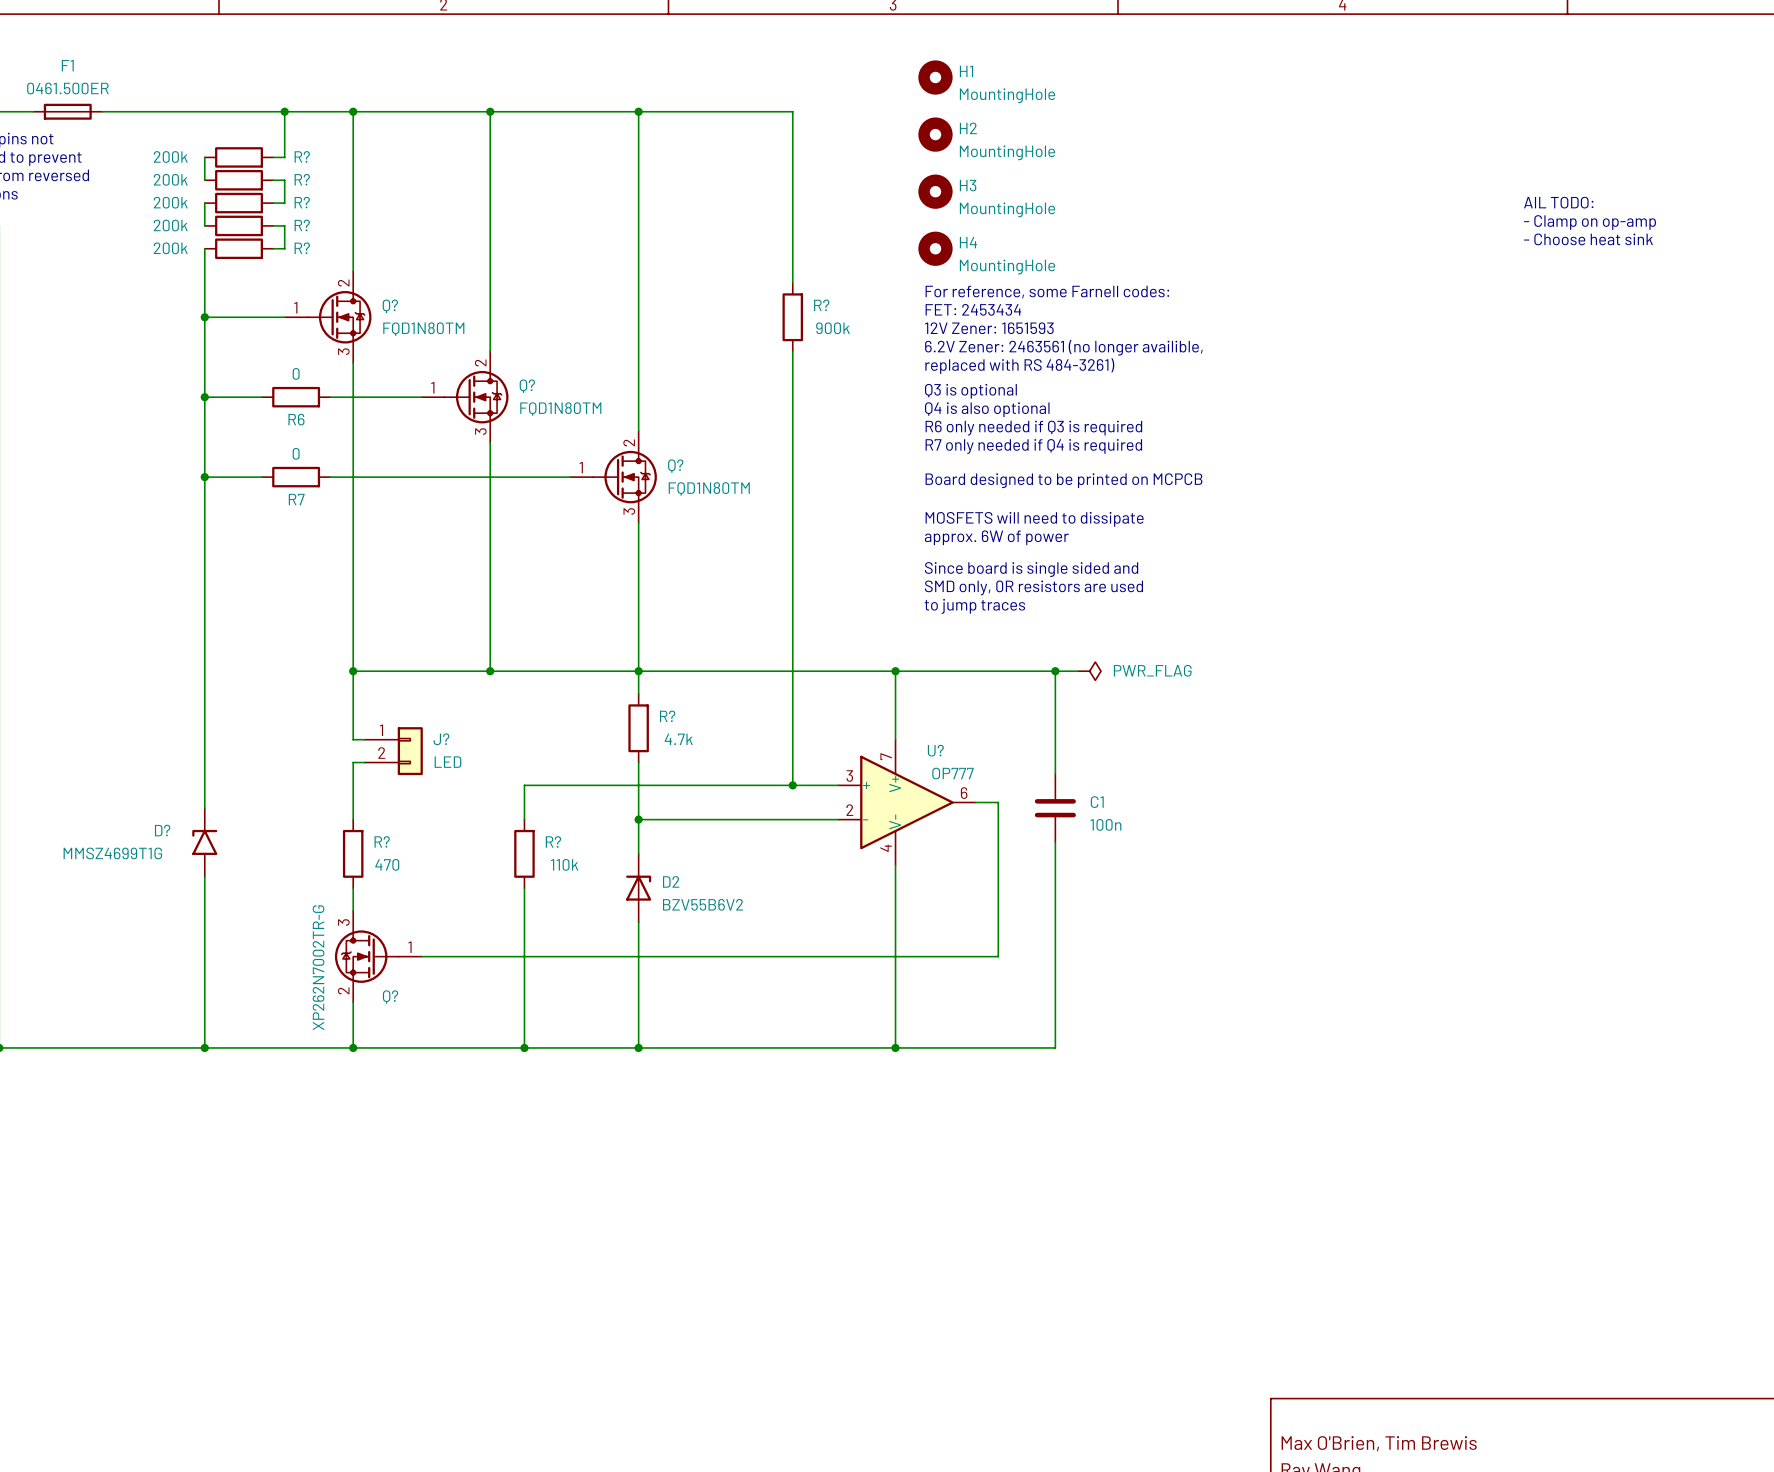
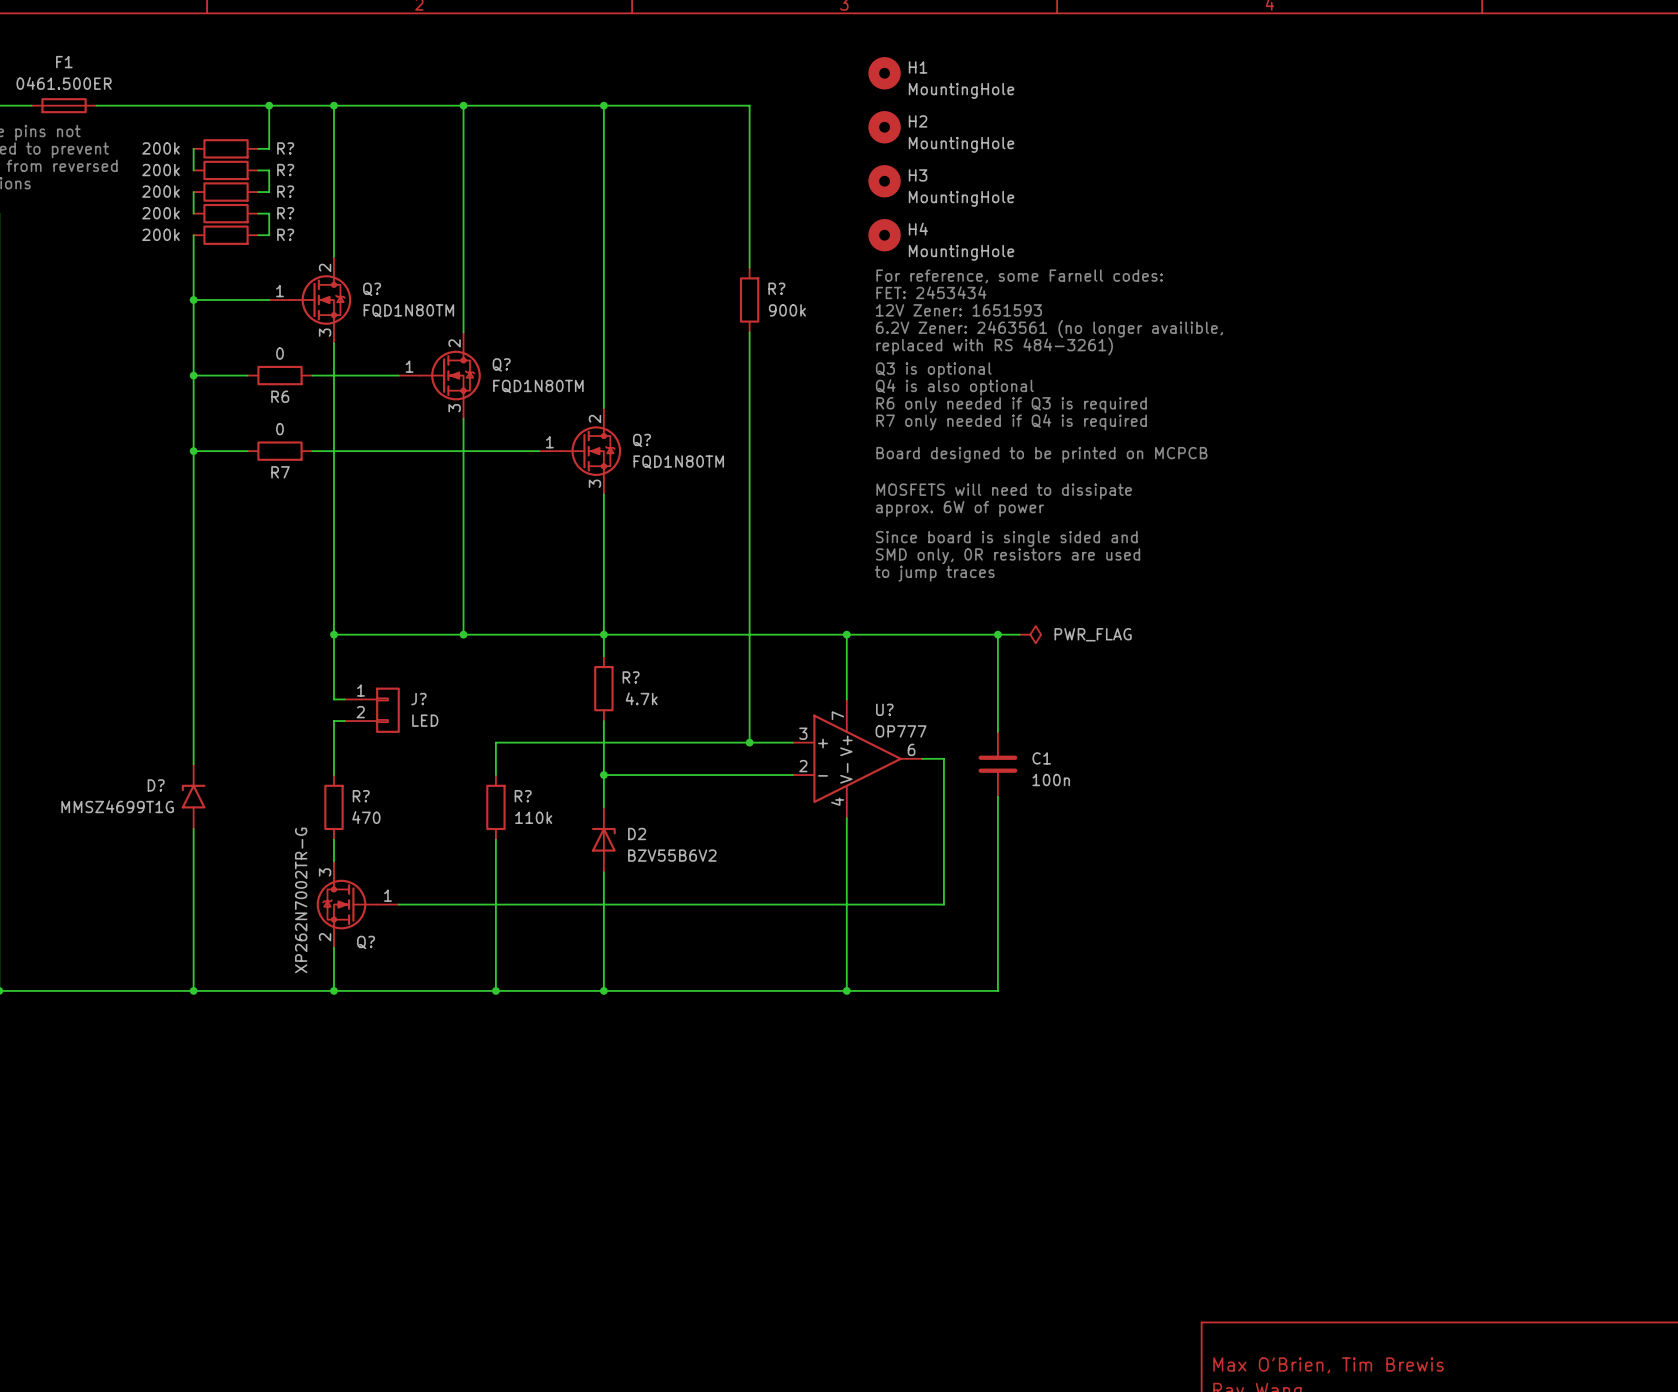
text: AIL TODO: (1558, 202) -> none
text: - Clamp on op-amp (1590, 222) -> none
text: - Choose heat sink (1588, 239) -> none

